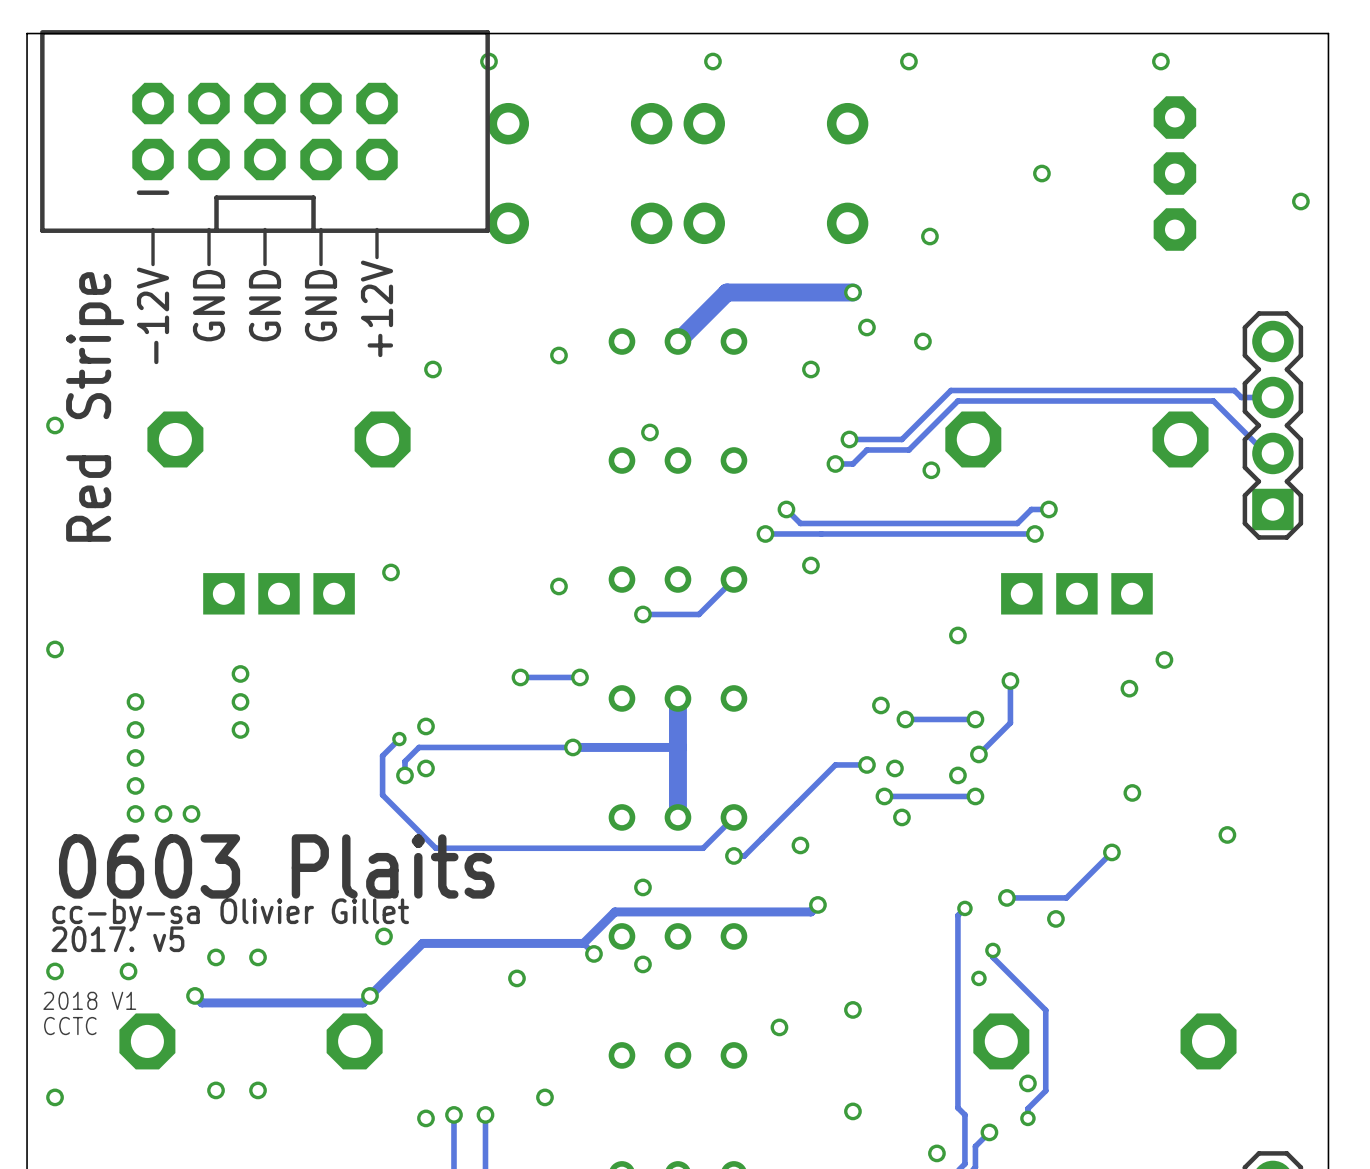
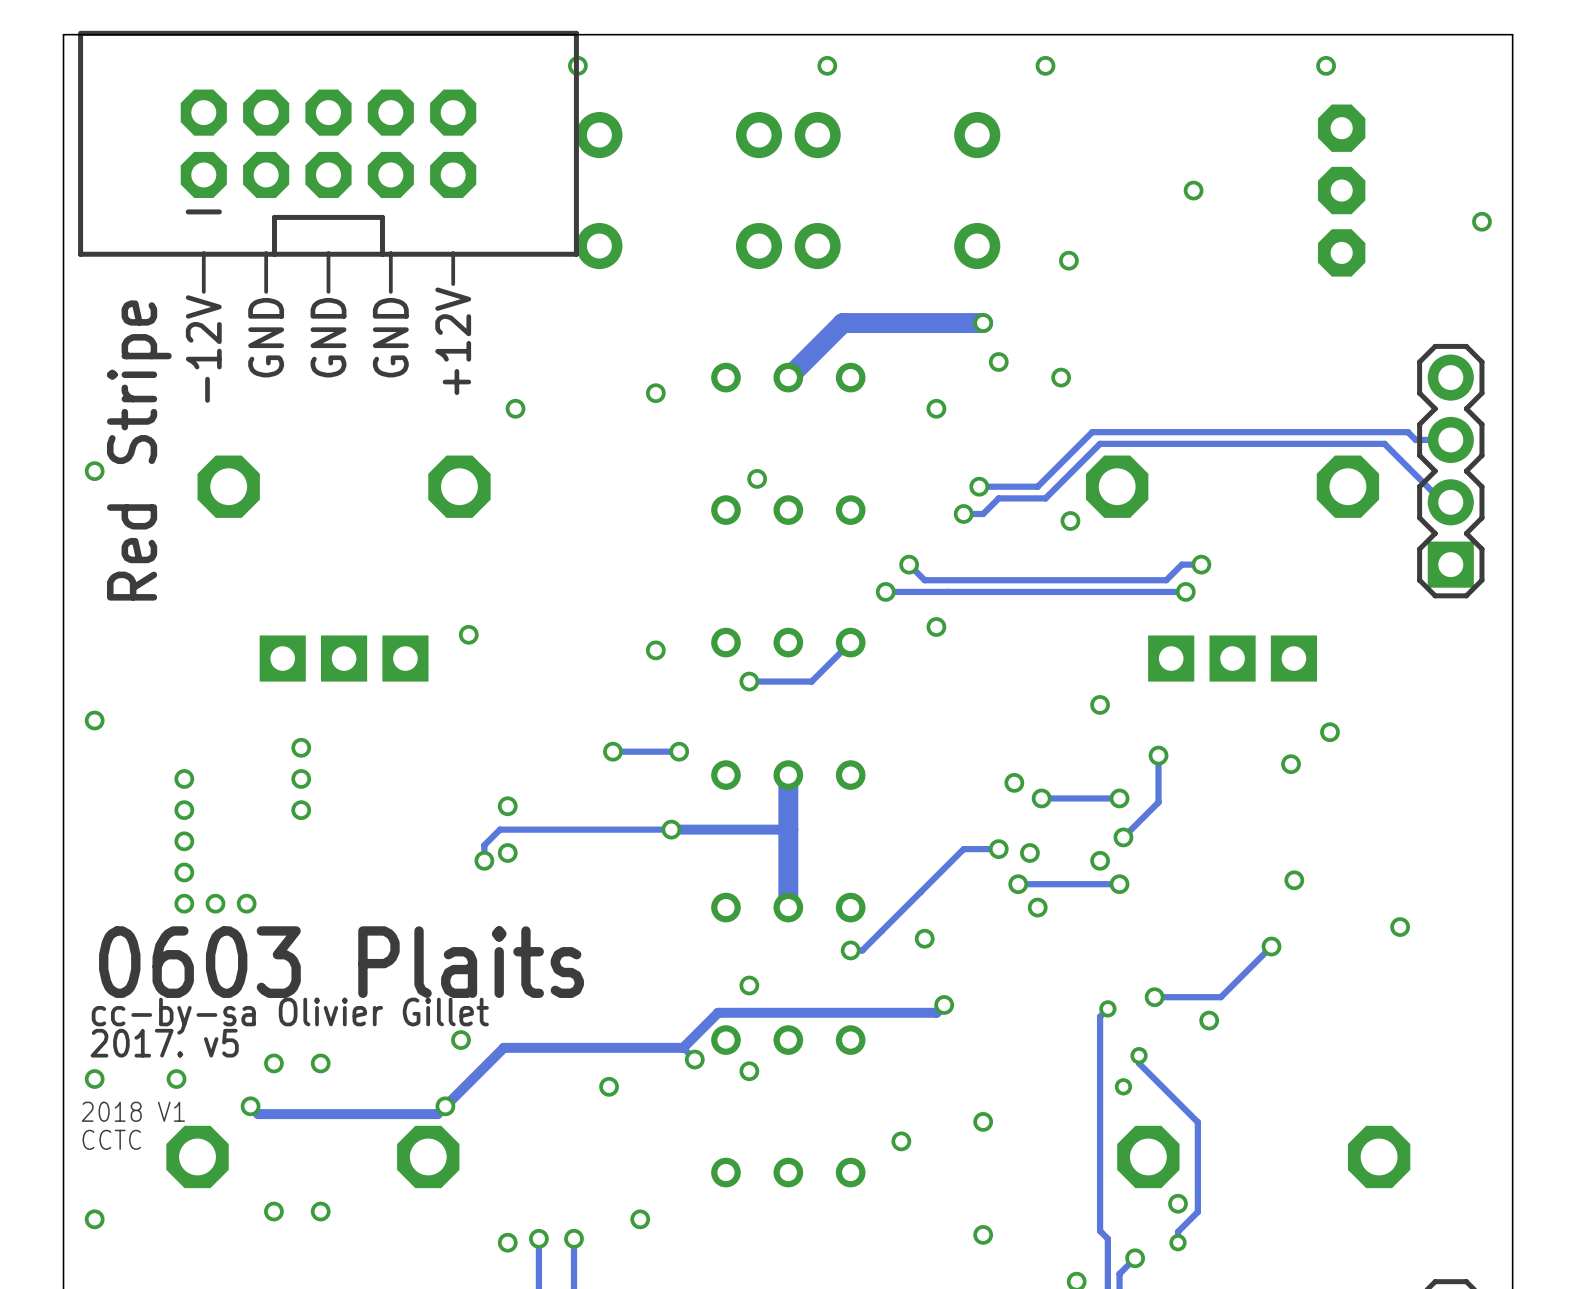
track: (399, 739) (382, 755) (382, 795) (435, 848) (703, 848) (733, 817) -> none
via: (399, 739) -> none

